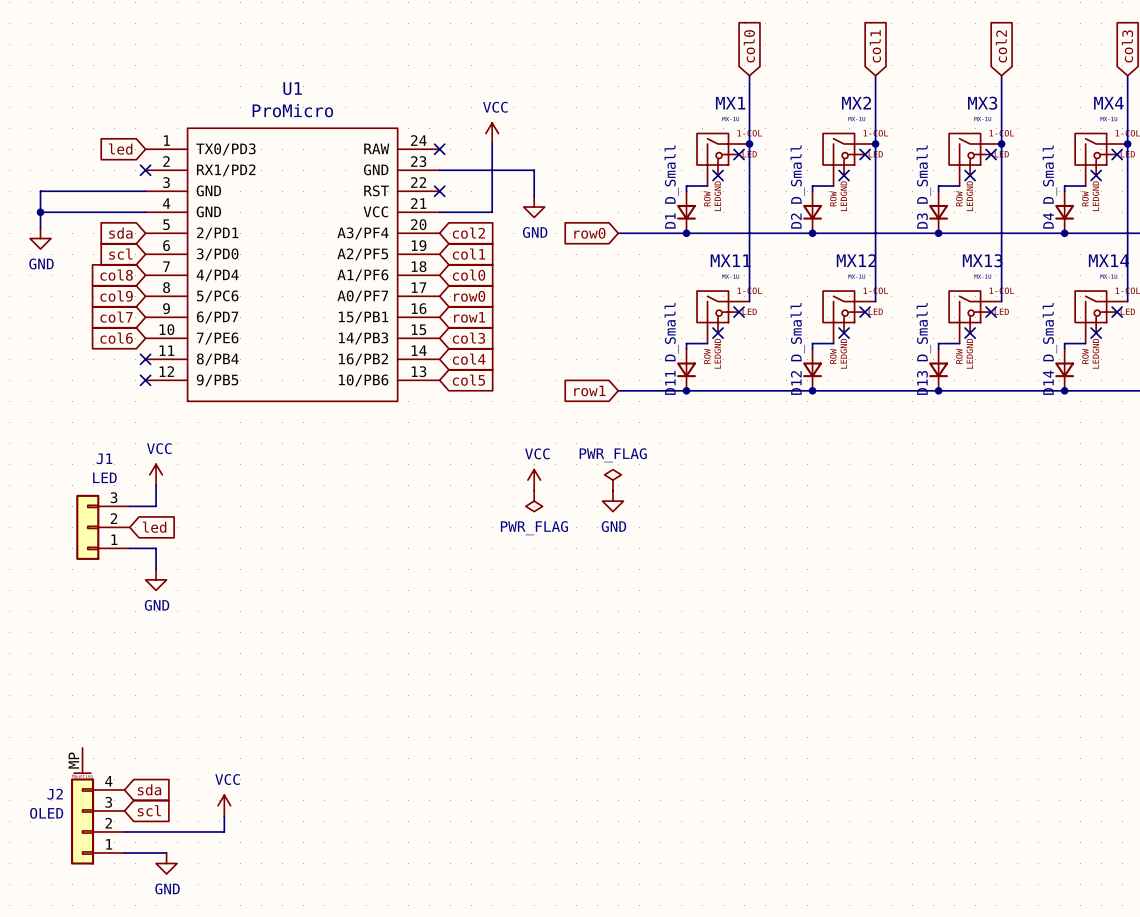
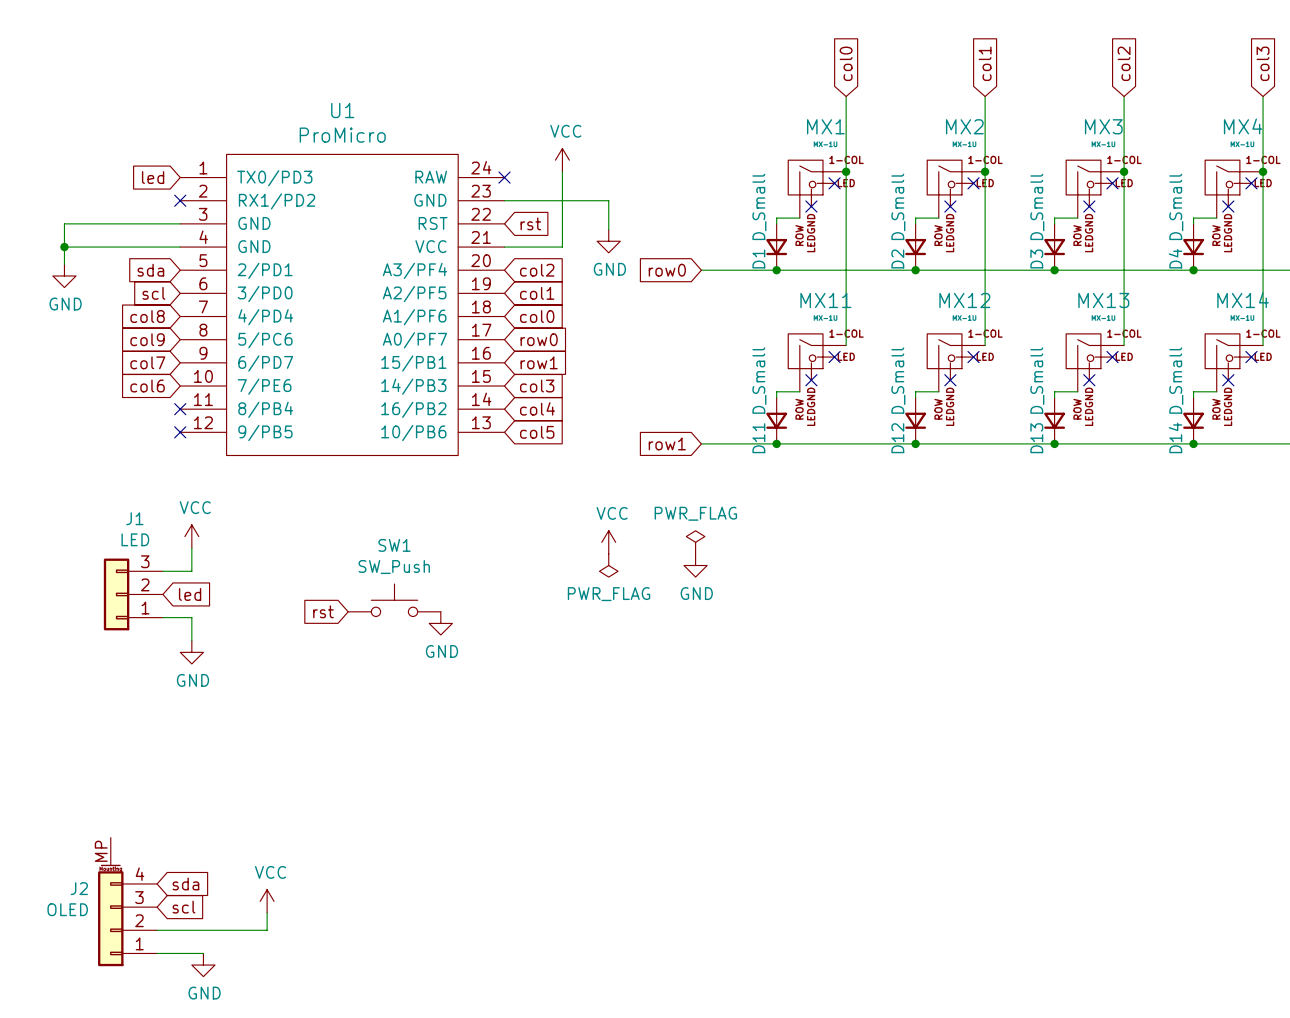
no-connect mark: (439, 191) -> none
global label: none -> rst (530, 223)
SW1: none -> SW_Push (394, 600)
global label: none -> rst (323, 611)
power symbol: none -> GND (440, 623)

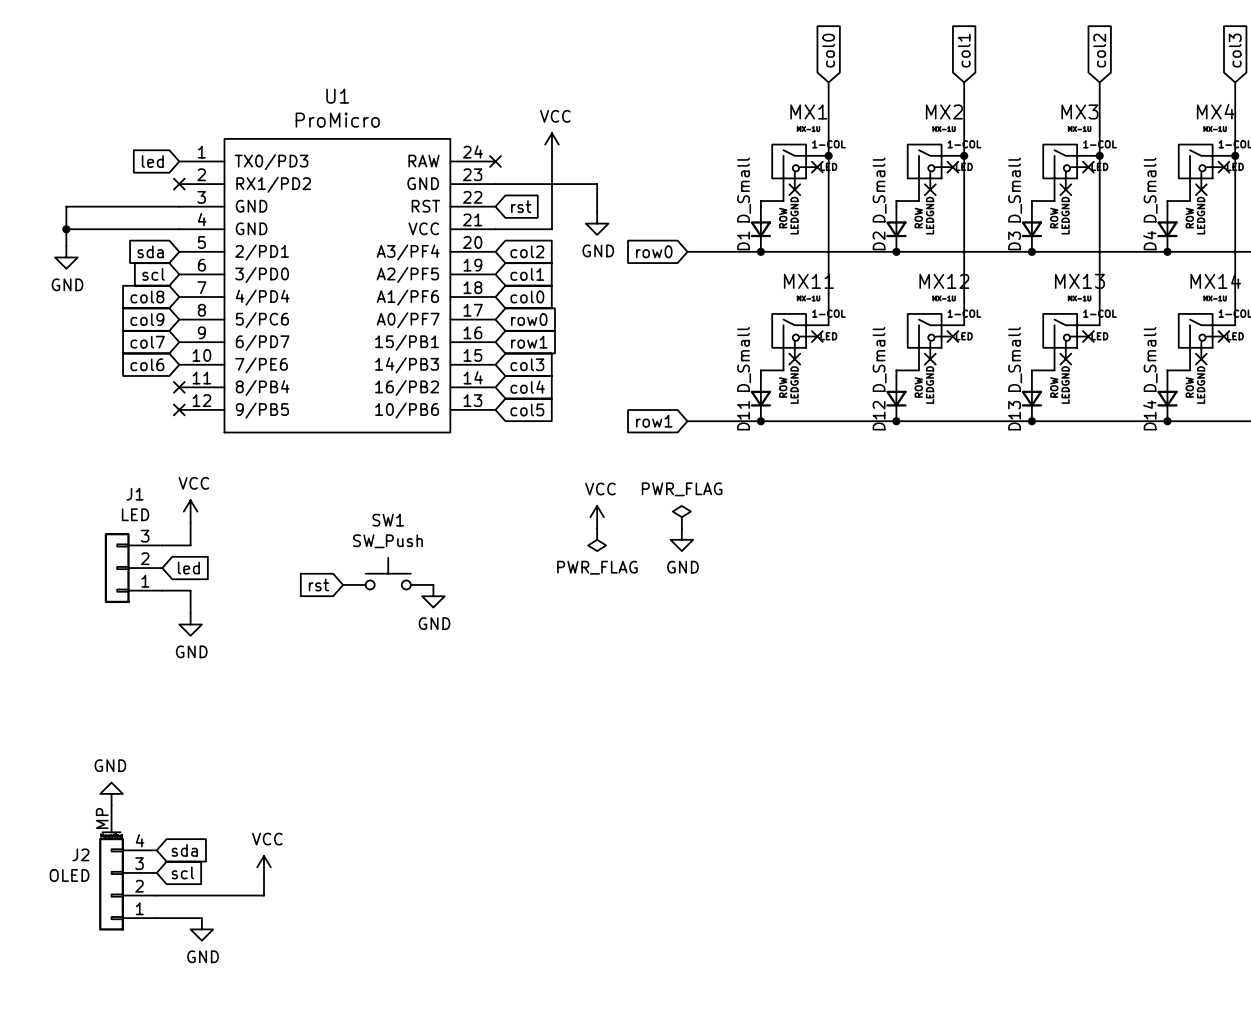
power symbol: none -> GND (111, 793)

